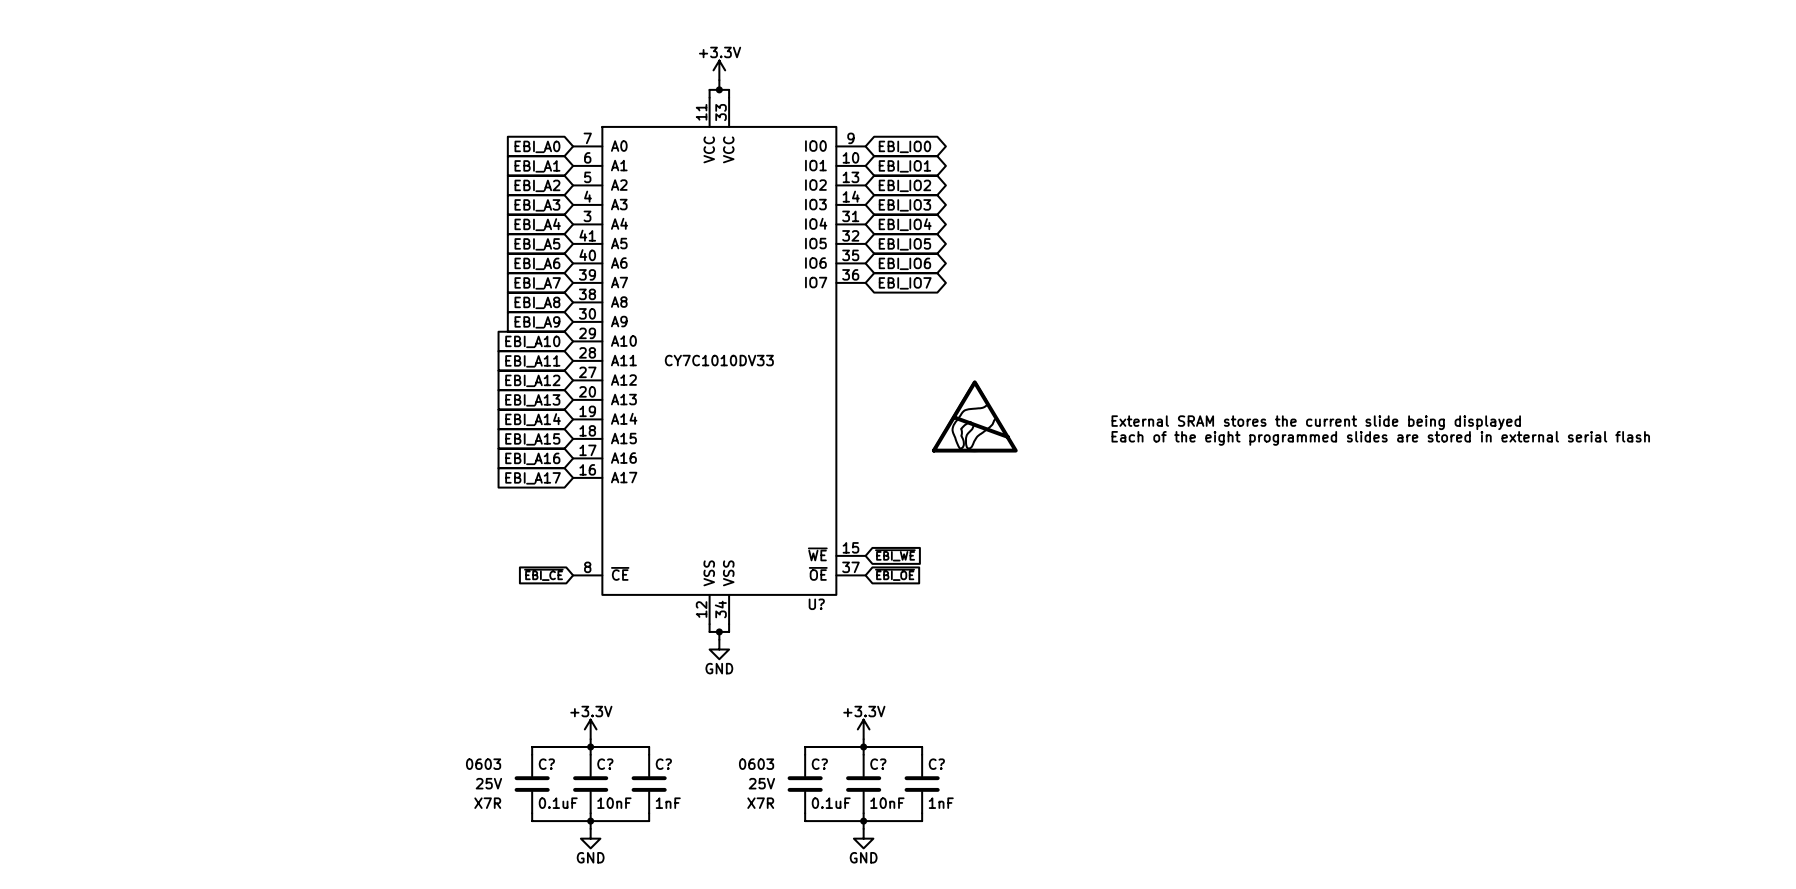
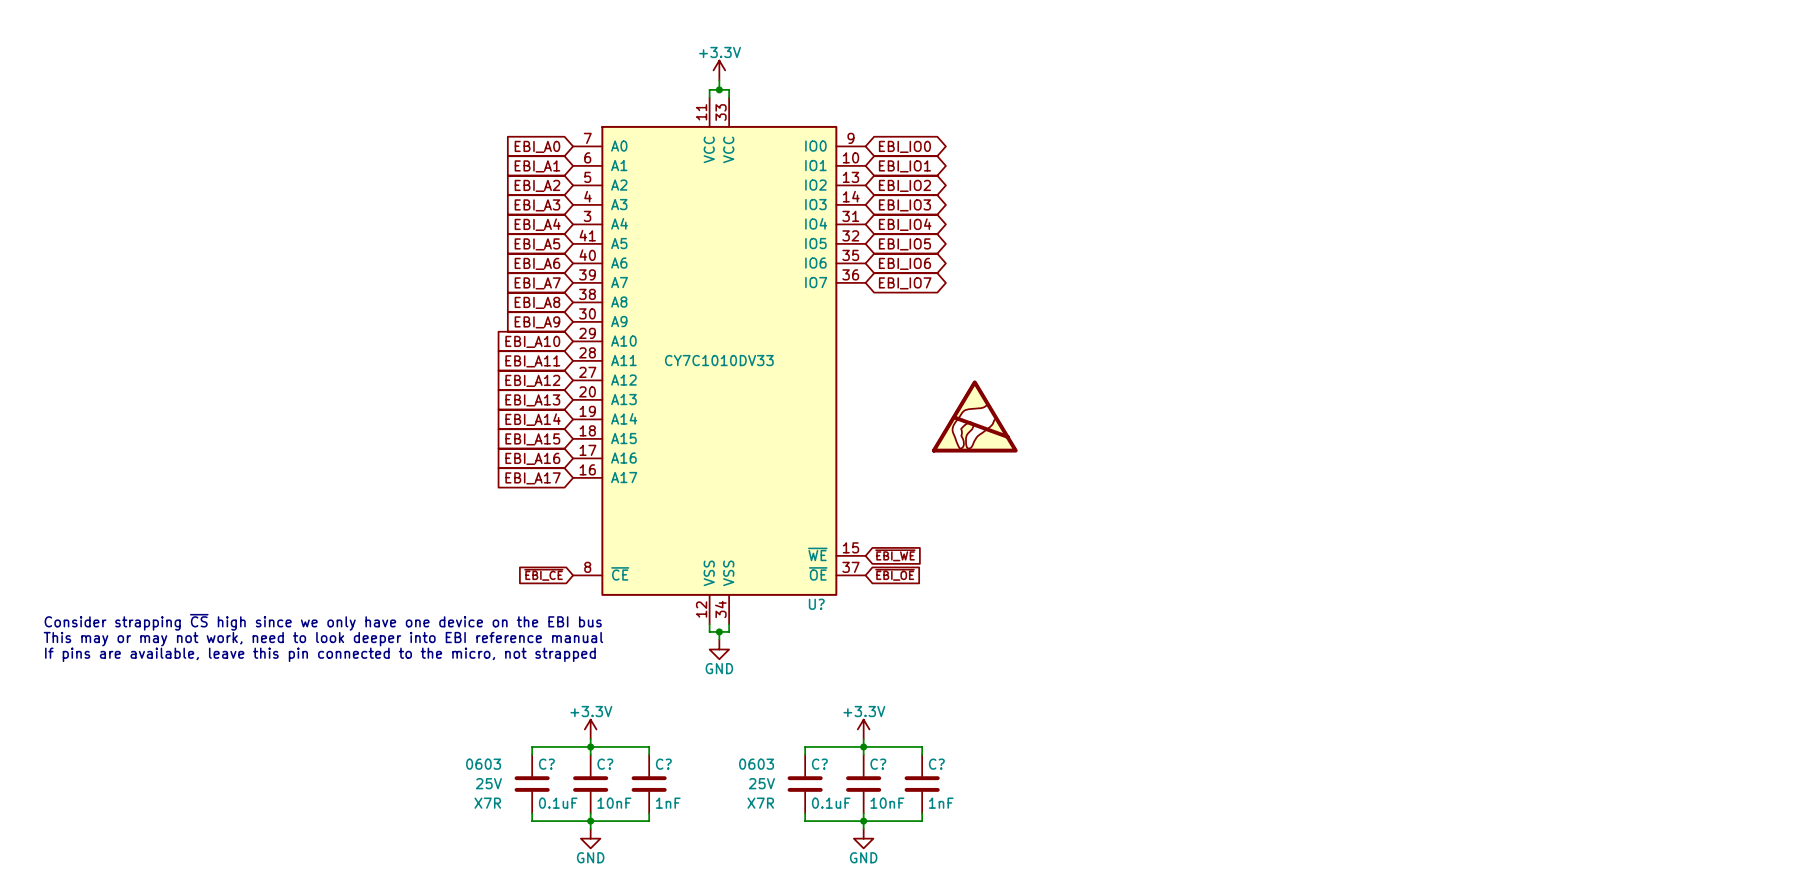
text: External SRAM stores the current slide being displayed (1316, 422) -> none
text: Each of the eight programmed slides are stored in external serial flash (1380, 438) -> none
text: none -> Consider strapping ~{CS} high since we only have one device on the EBI bus (323, 622)
text: none -> This may or may not work, need to look deeper into EBI reference manual (323, 639)
text: none -> If pins are available, leave this pin connected to the micro, not strapped (320, 654)

